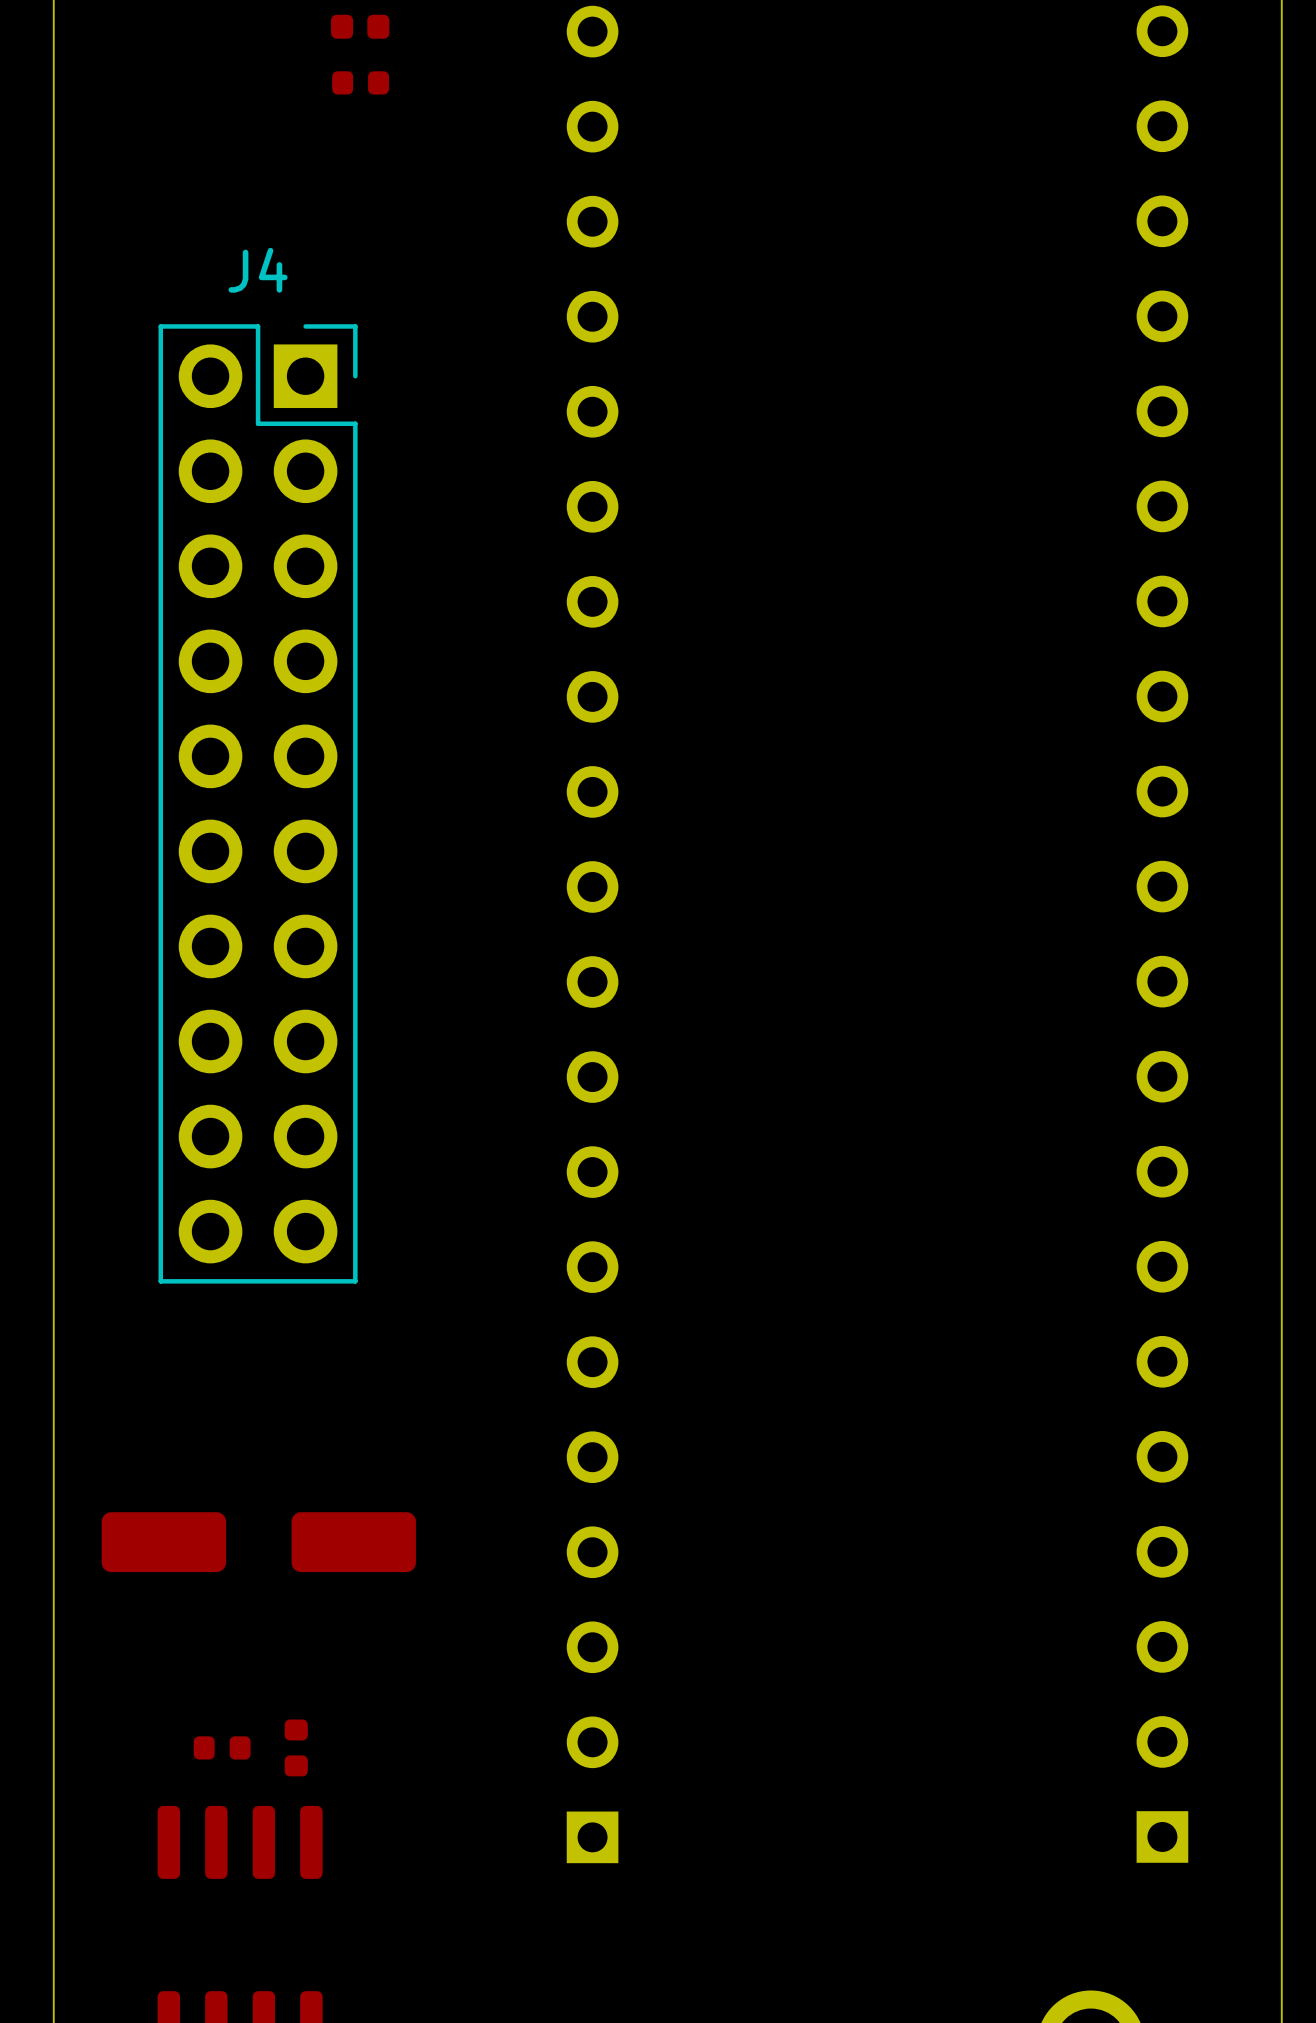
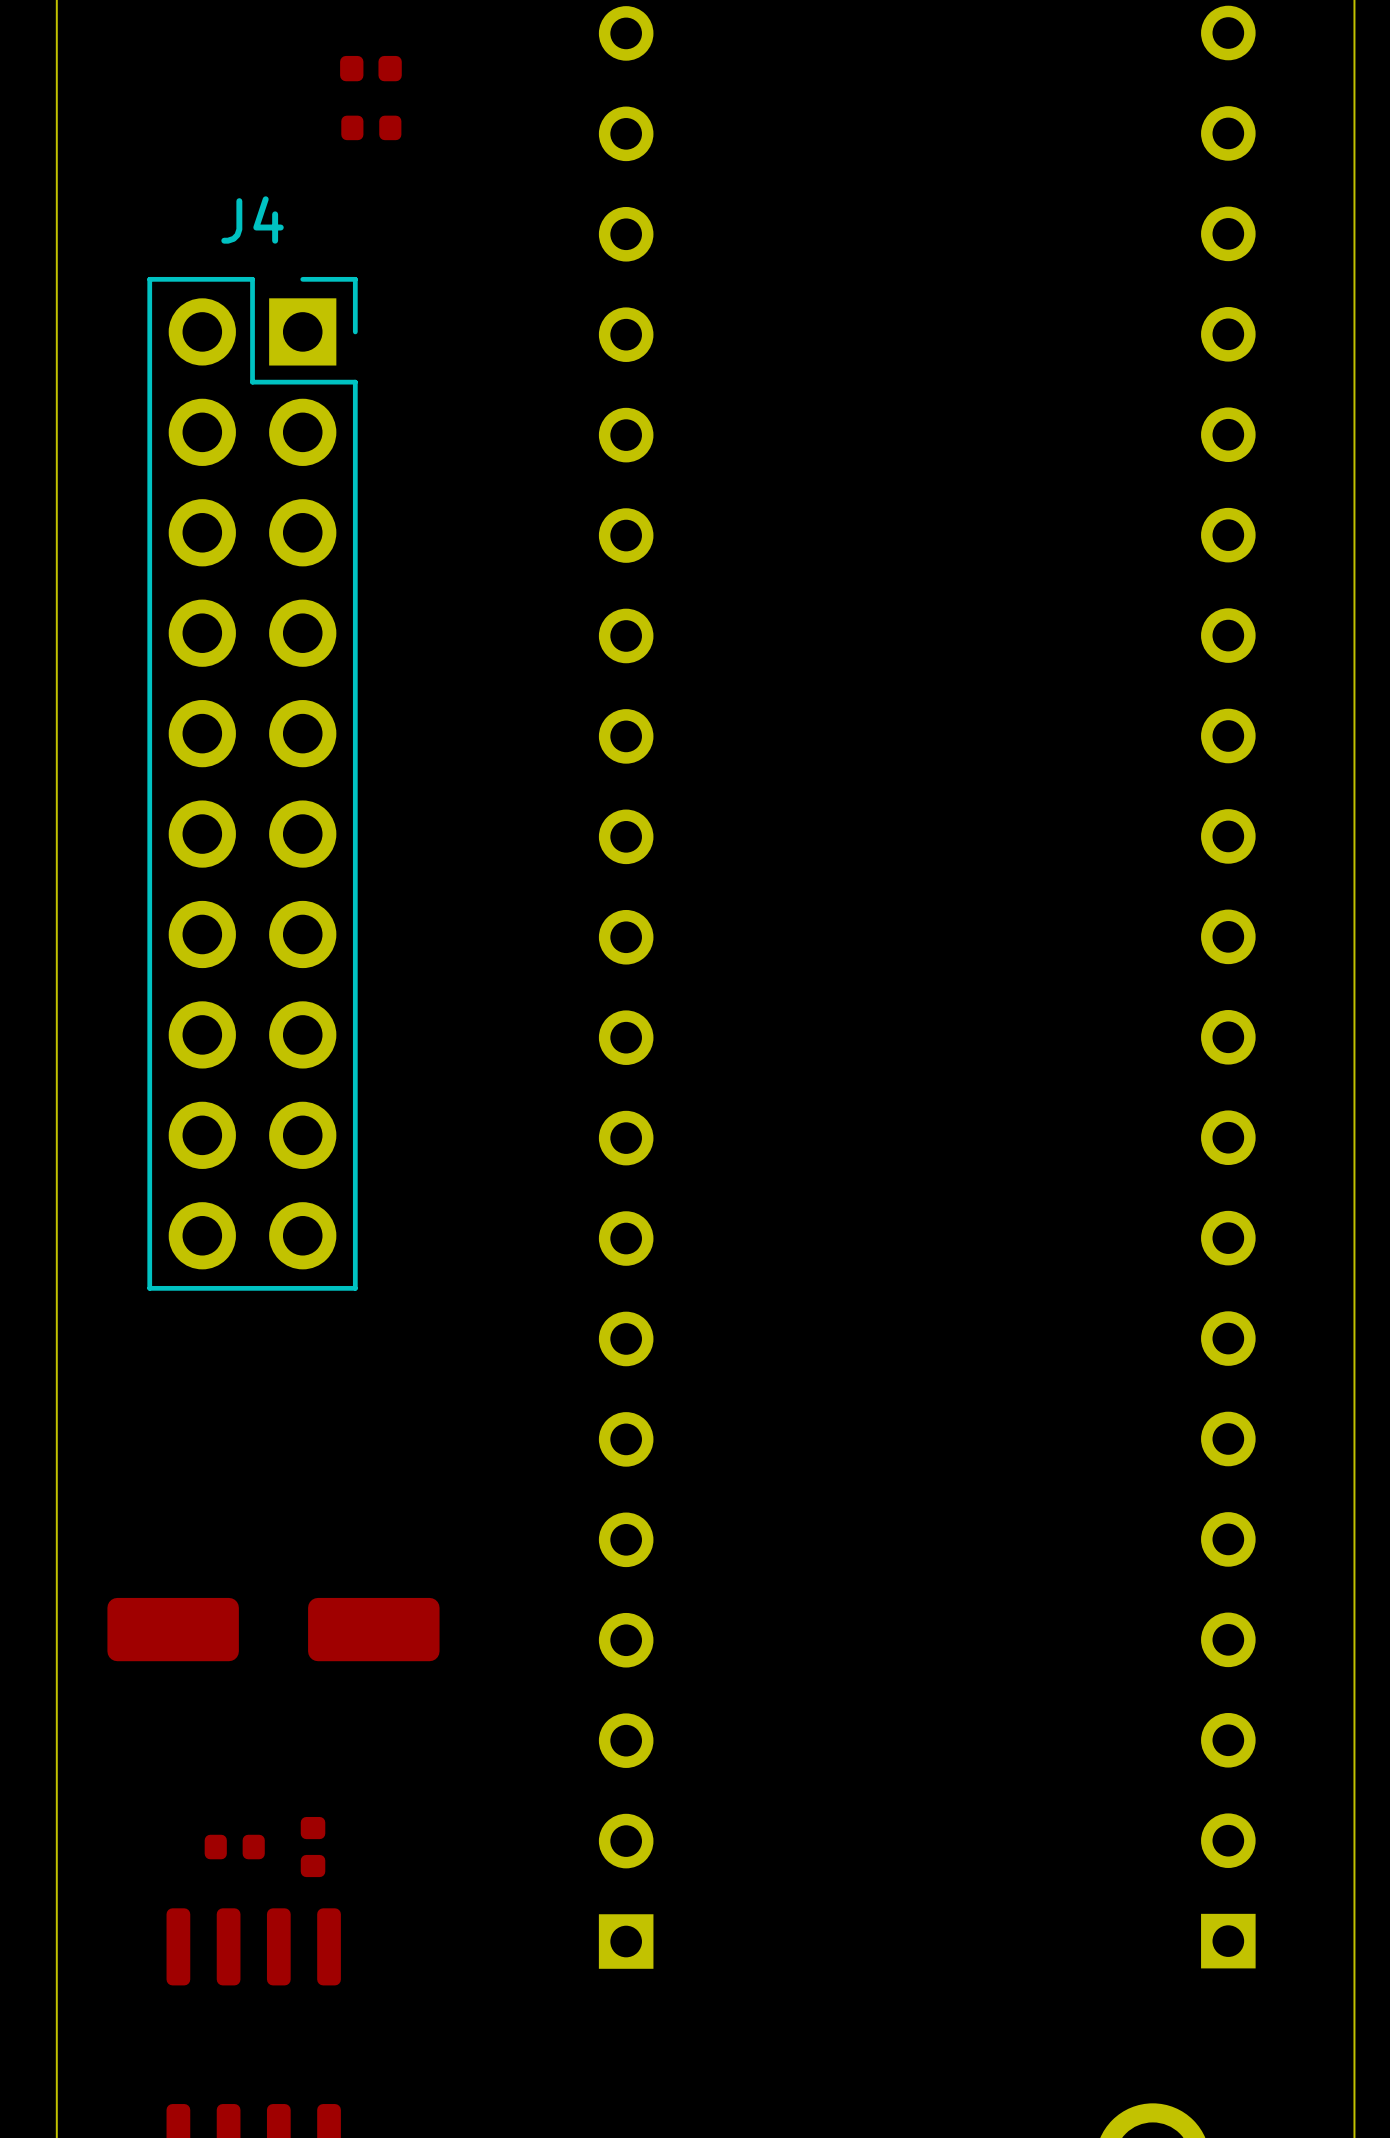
part position: (360, 26) -> (370, 68)
part position: (360, 82) -> (371, 127)
J4 position: (258, 803) -> (252, 783)

